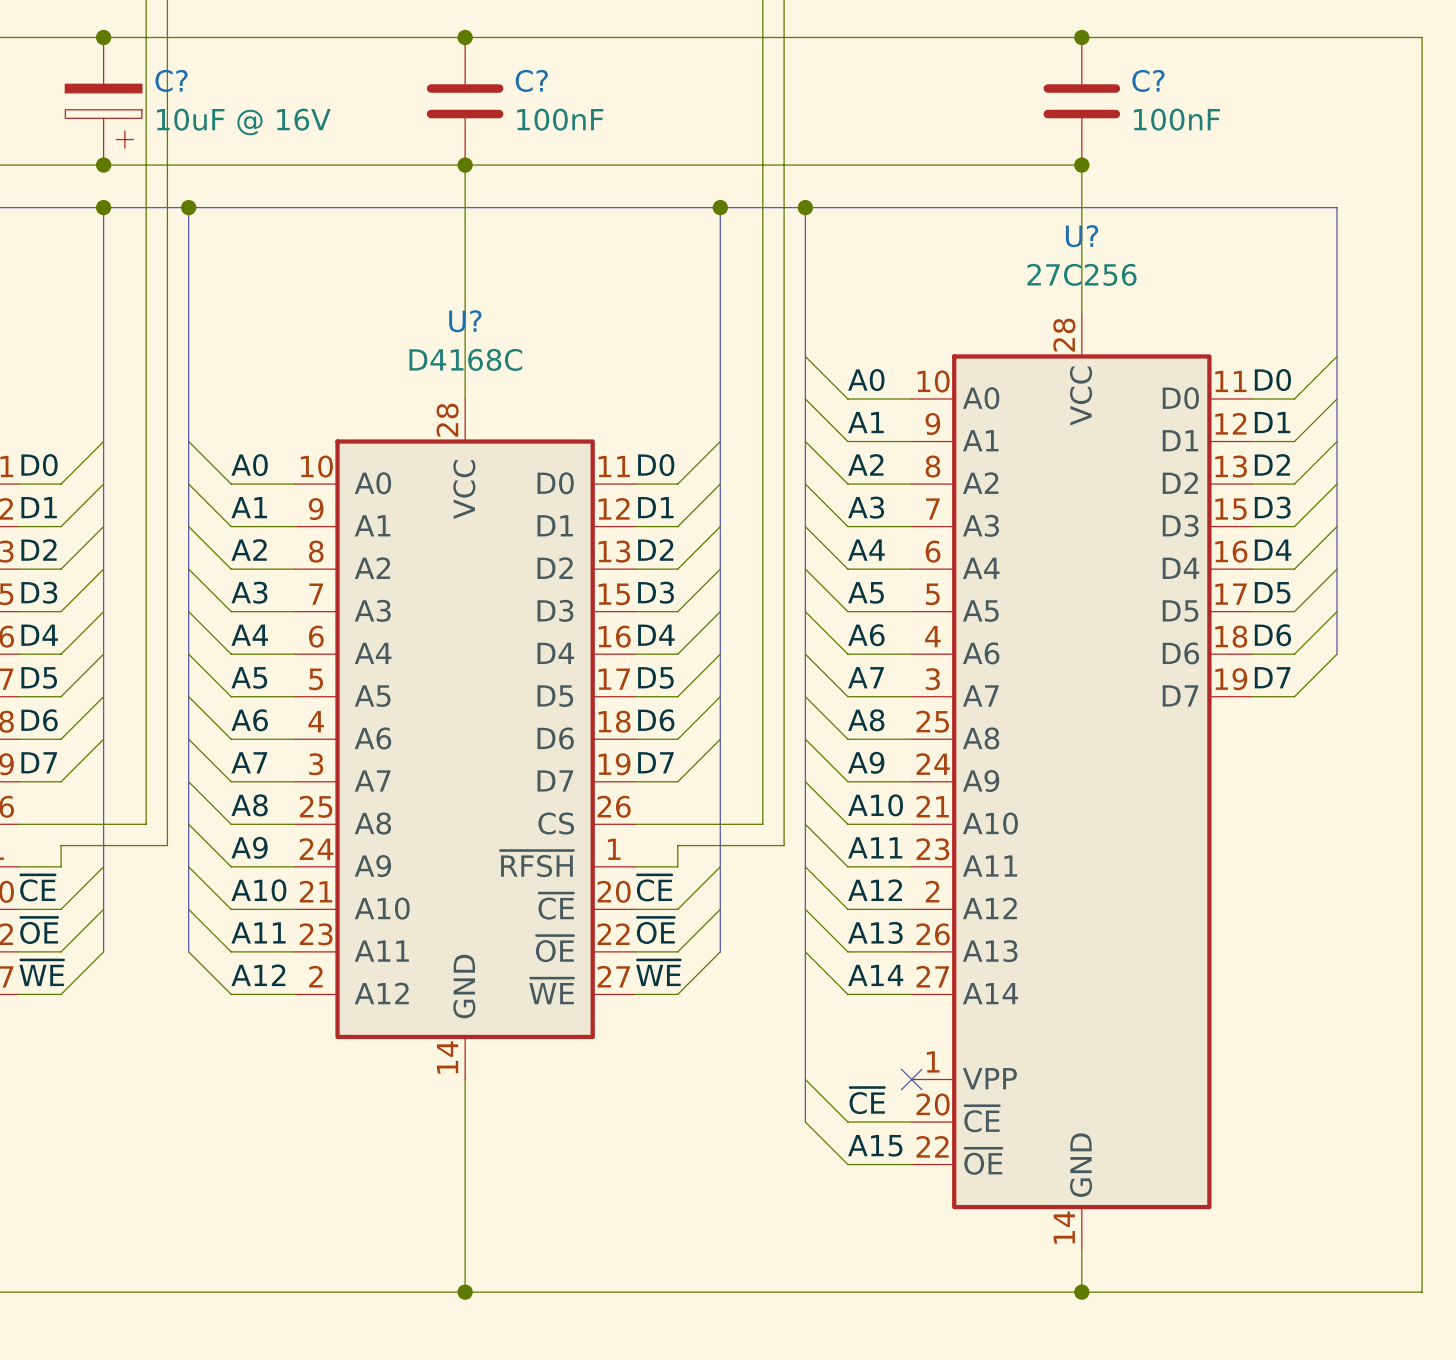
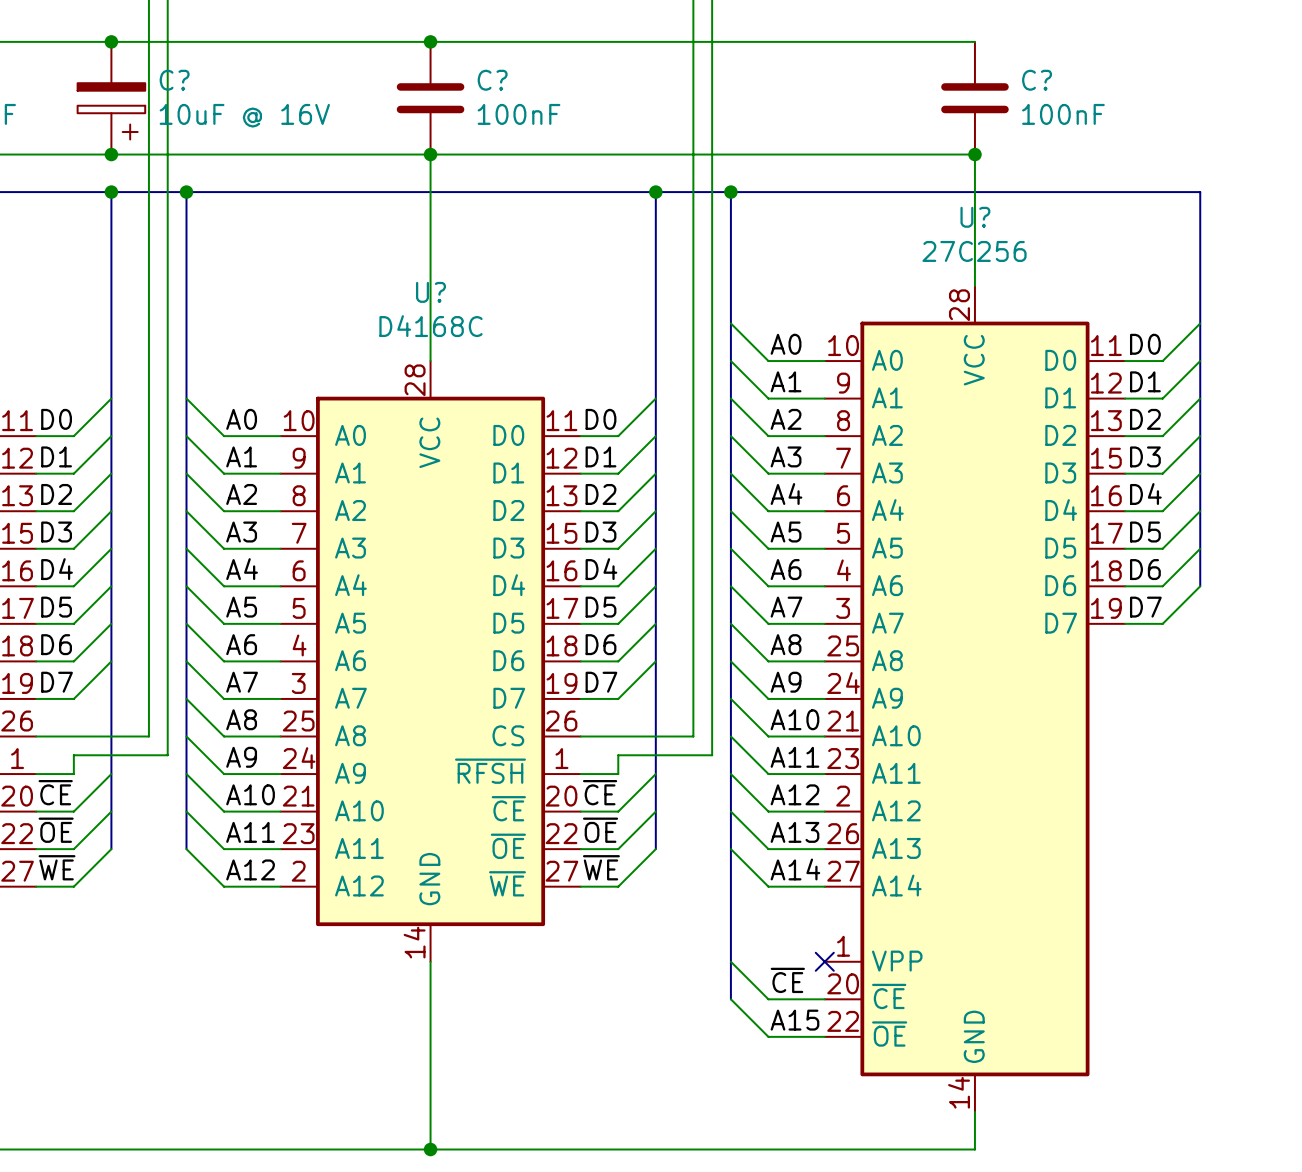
wire: (1081, 37) (1422, 37) (1422, 1292) (1081, 1292) -> none
junction: (1081, 37) -> none
junction: (1081, 1292) -> none

